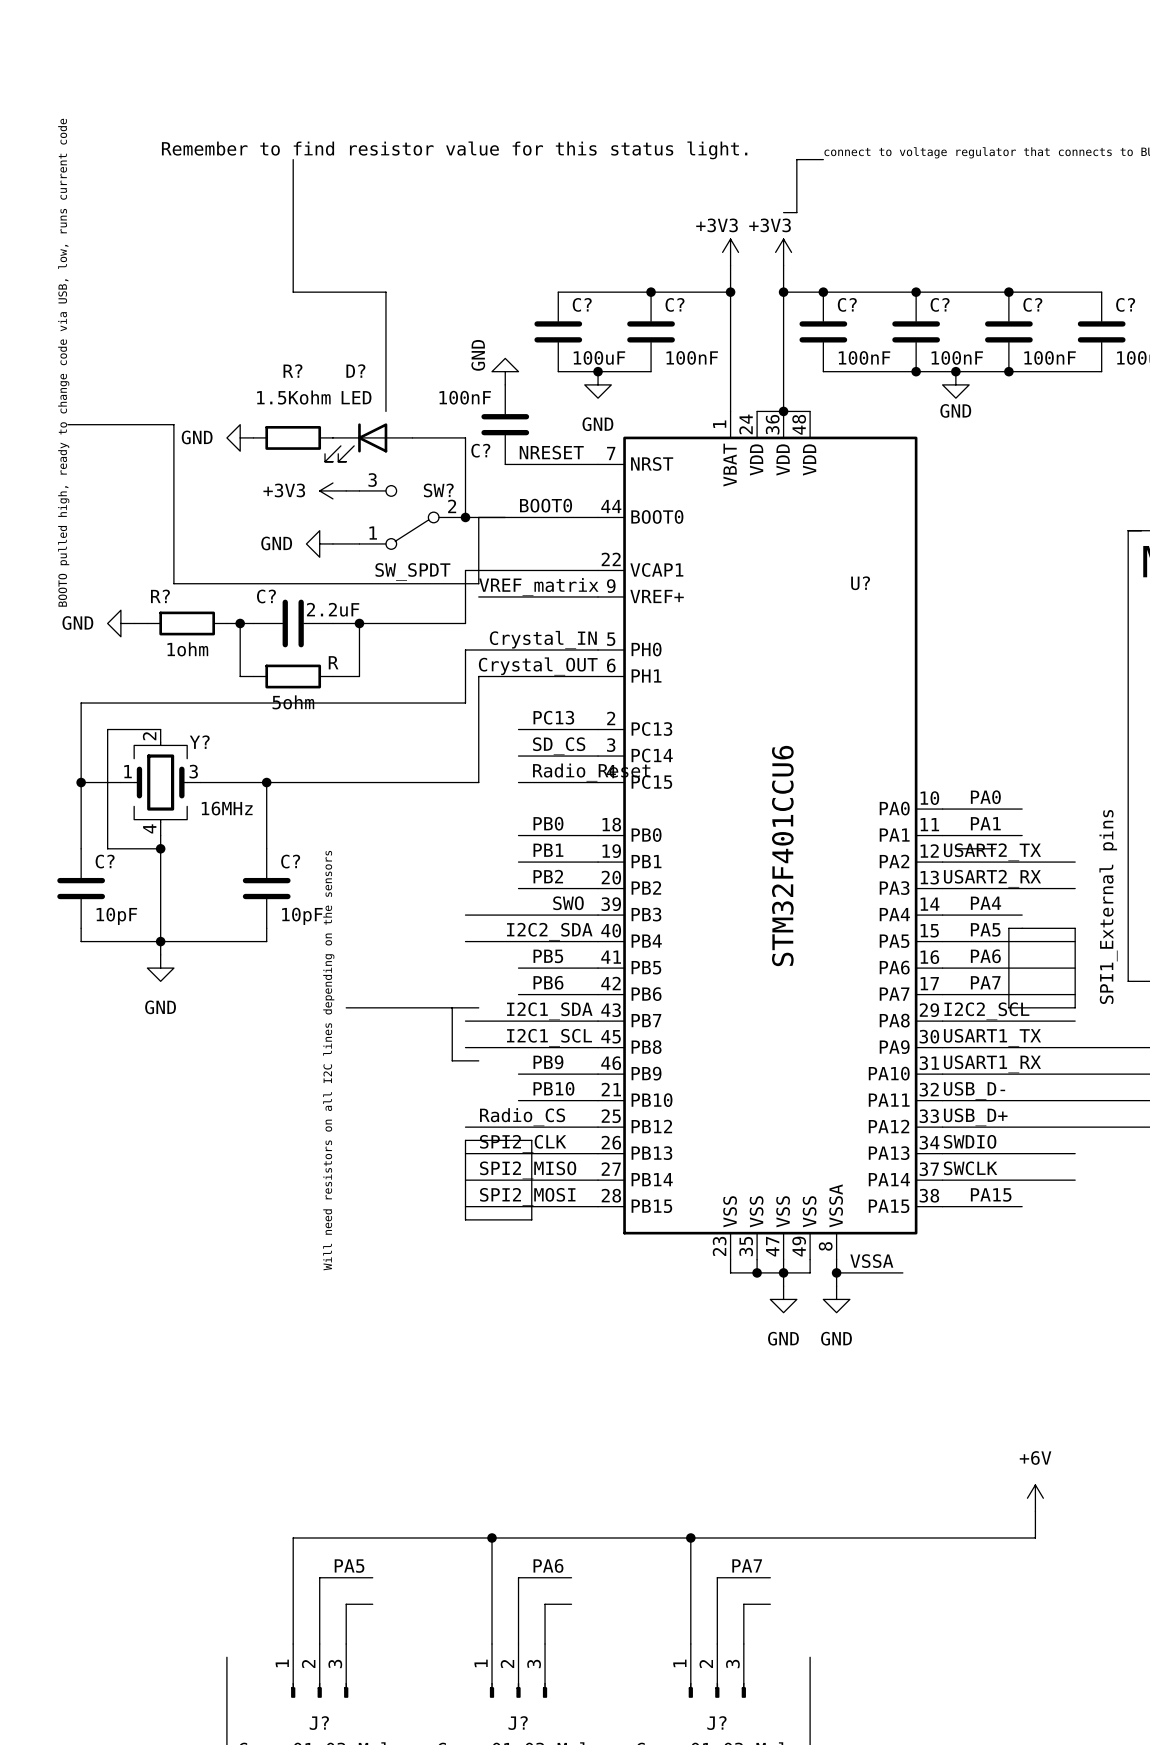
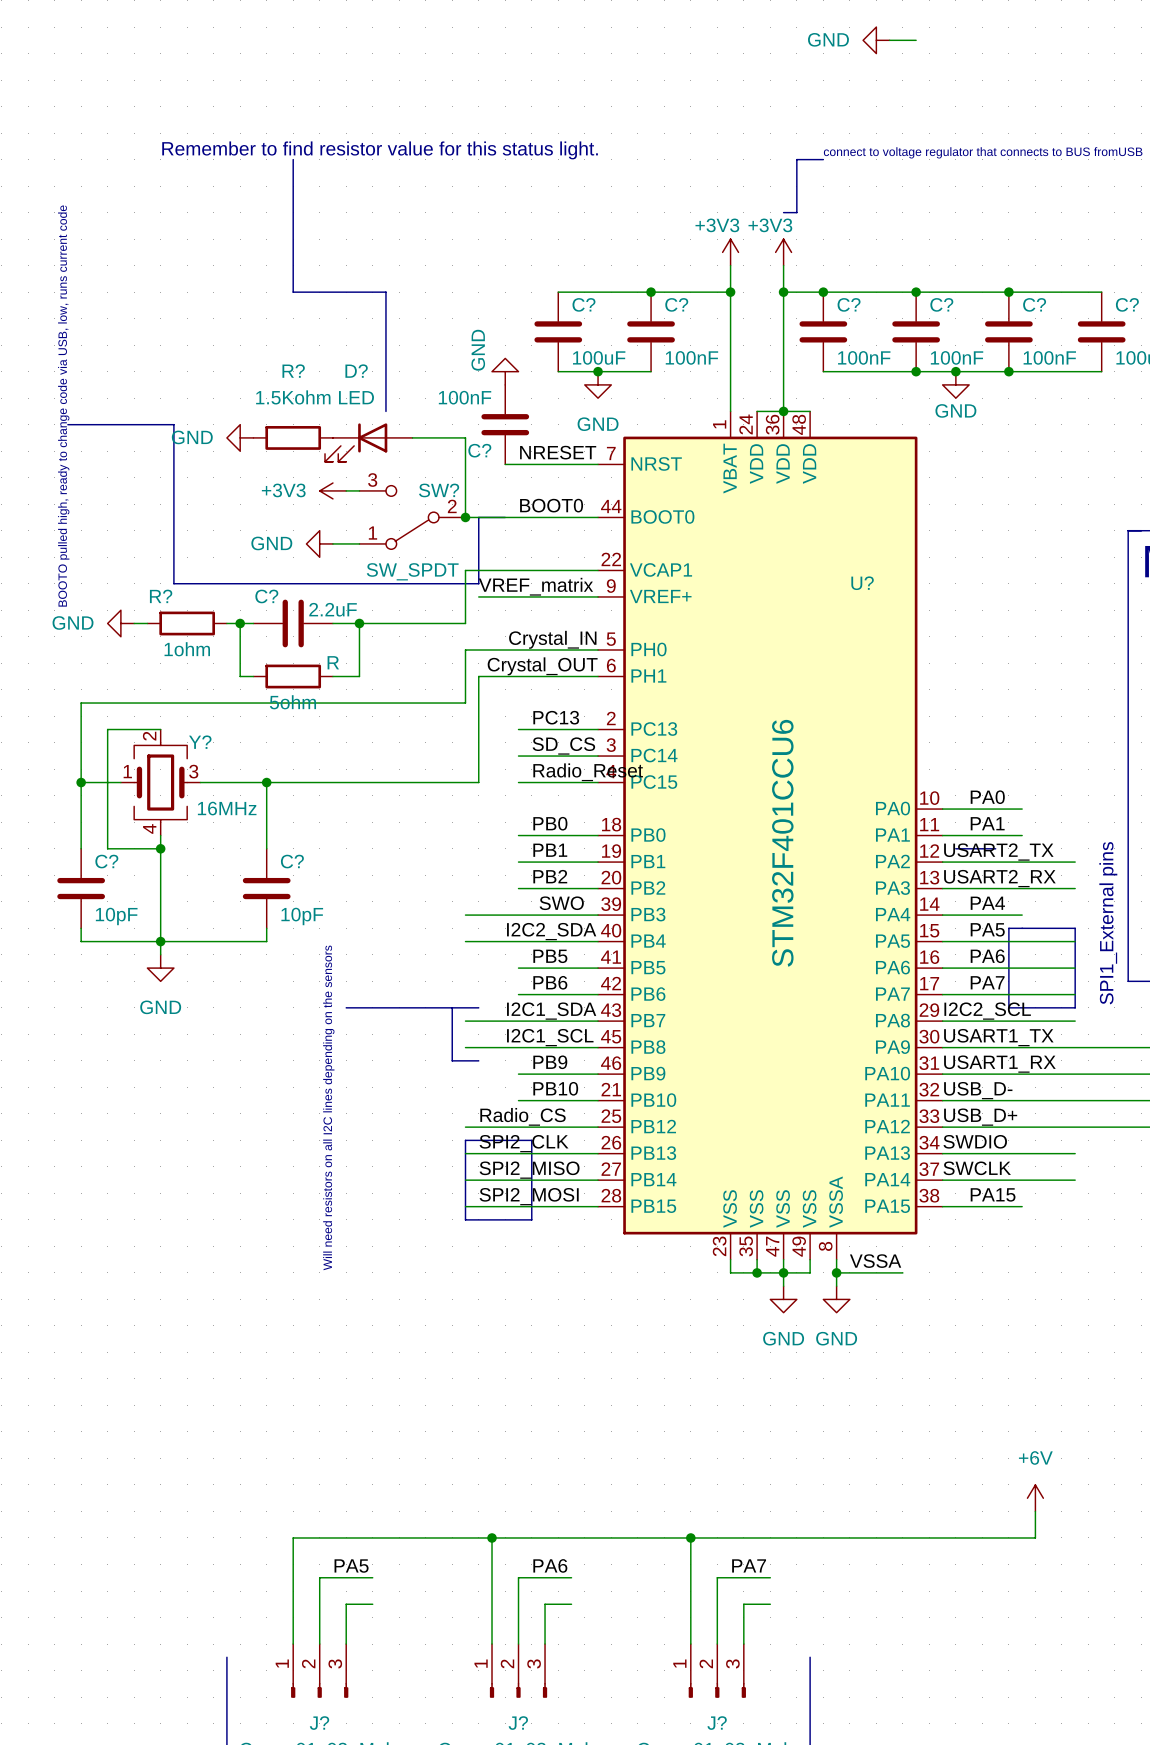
power symbol: none -> GND (876, 40)
wire: none -> (889, 40) (916, 40)

